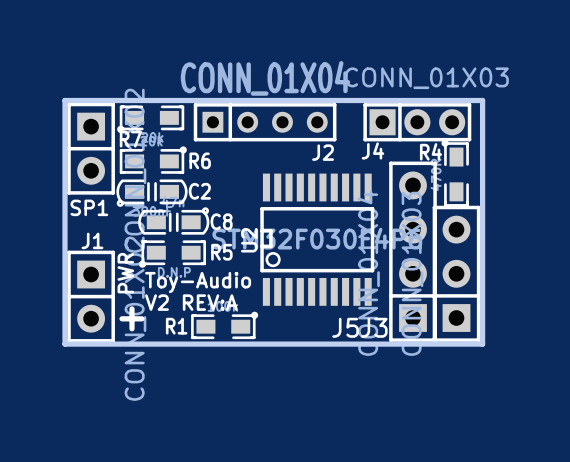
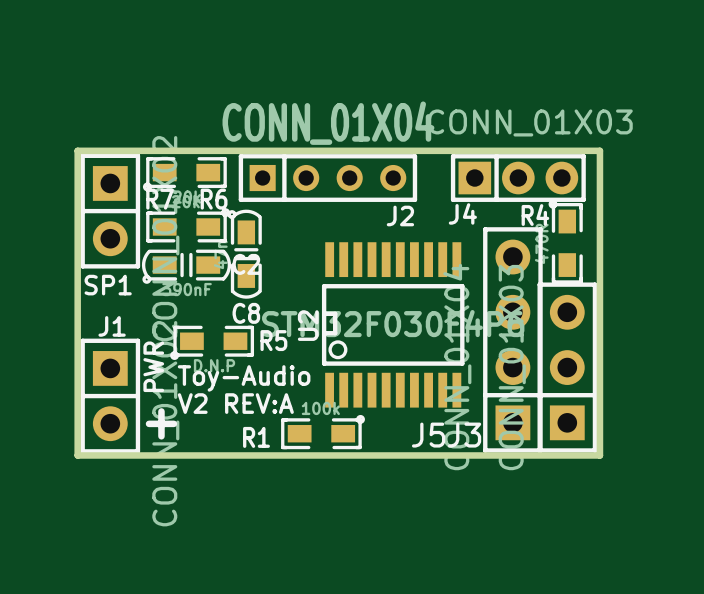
R6 name position: R6 (200, 160) -> R6 (214, 199)
C8 rotation: 0° (173, 221) -> 90° counterclockwise (244, 254)
C8 position: (173, 221) -> (244, 254)
C8 name position: C8 (221, 221) -> C8 (246, 313)
R1 position: (224, 325) -> (323, 432)
R1 name position: R1 (176, 326) -> R1 (256, 437)

